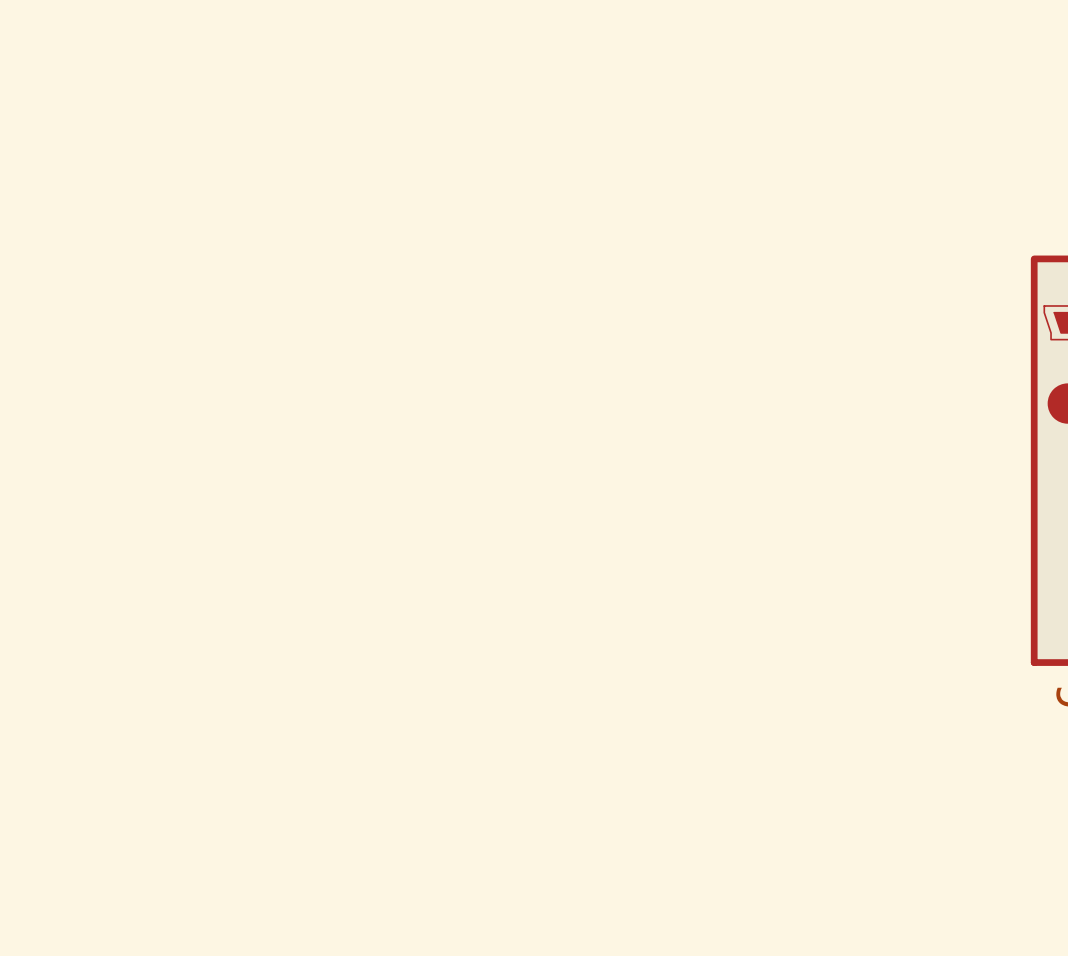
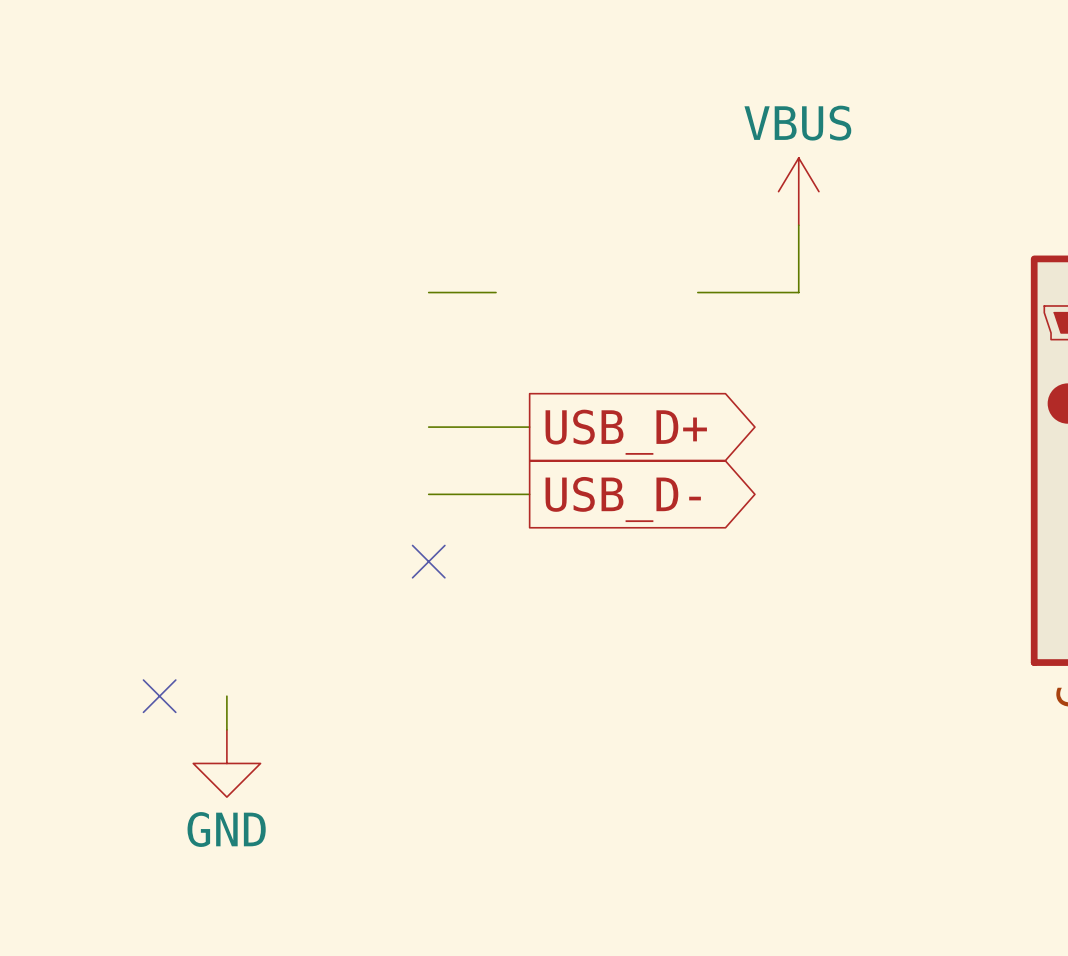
power symbol: none -> VBUS (798, 191)
wire: none -> (798, 225) (798, 292) (697, 292)
wire: none -> (428, 292) (496, 292)
wire: none -> (428, 427) (529, 427)
global label: none -> USB_D+ (626, 432)
wire: none -> (428, 494) (529, 494)
global label: none -> USB_D- (623, 499)
no-connect mark: none -> (428, 561)
no-connect mark: none -> (159, 696)
wire: none -> (226, 696) (226, 729)
power symbol: none -> GND (226, 763)

